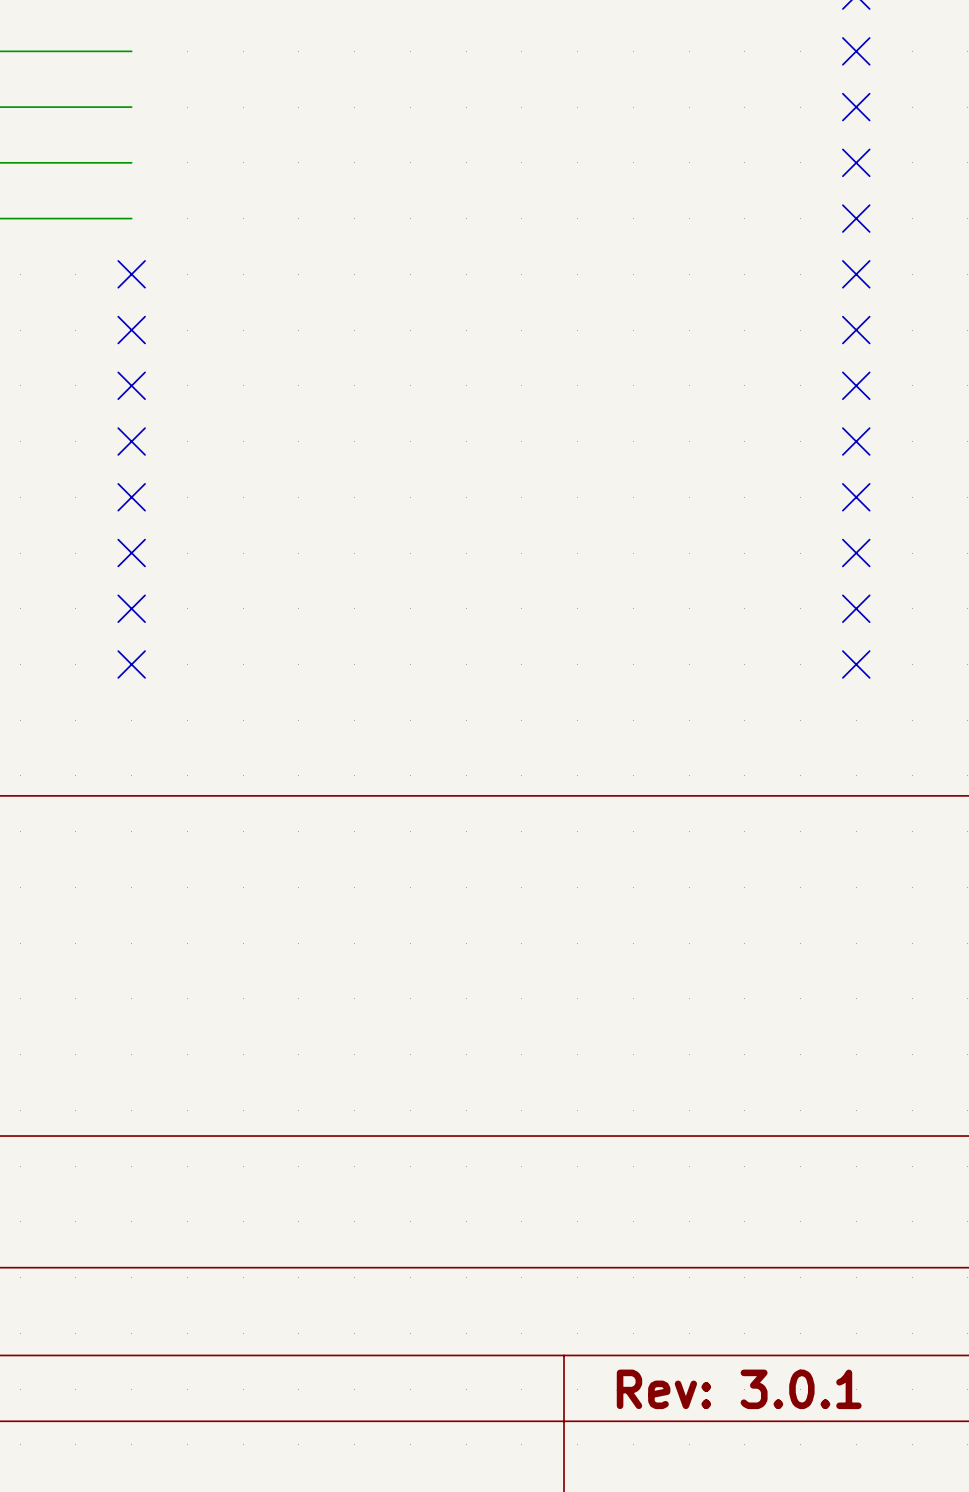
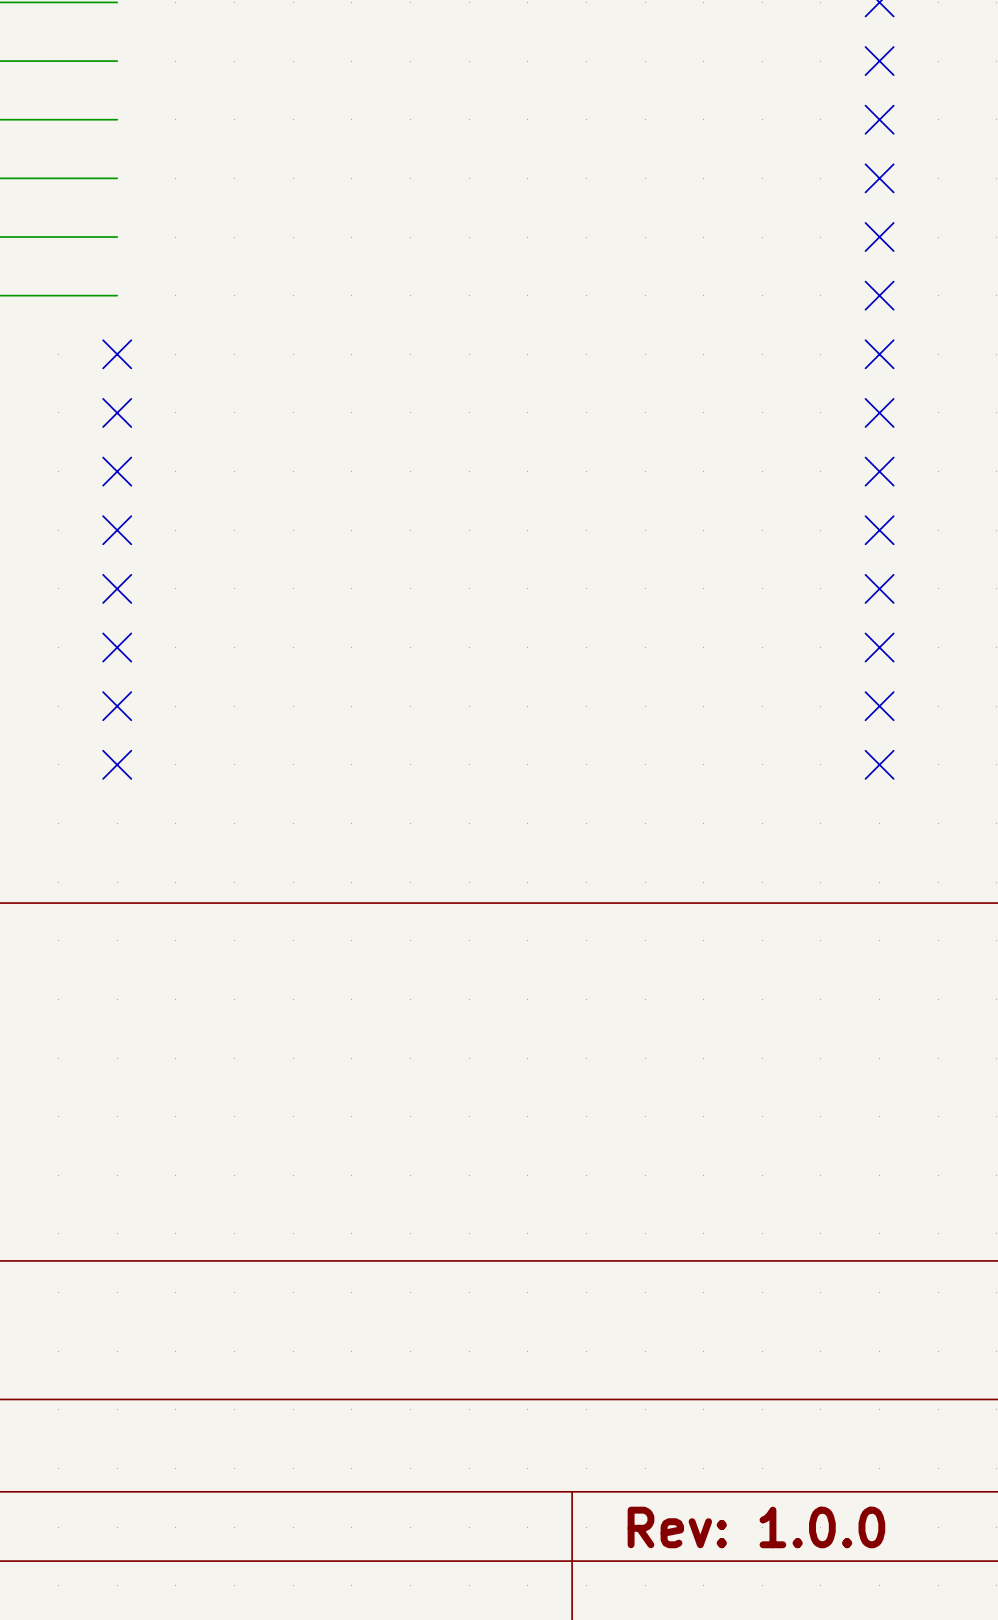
title block: Rev: 3.0.1 (739, 1389) -> Rev: 1.0.0 (756, 1527)

